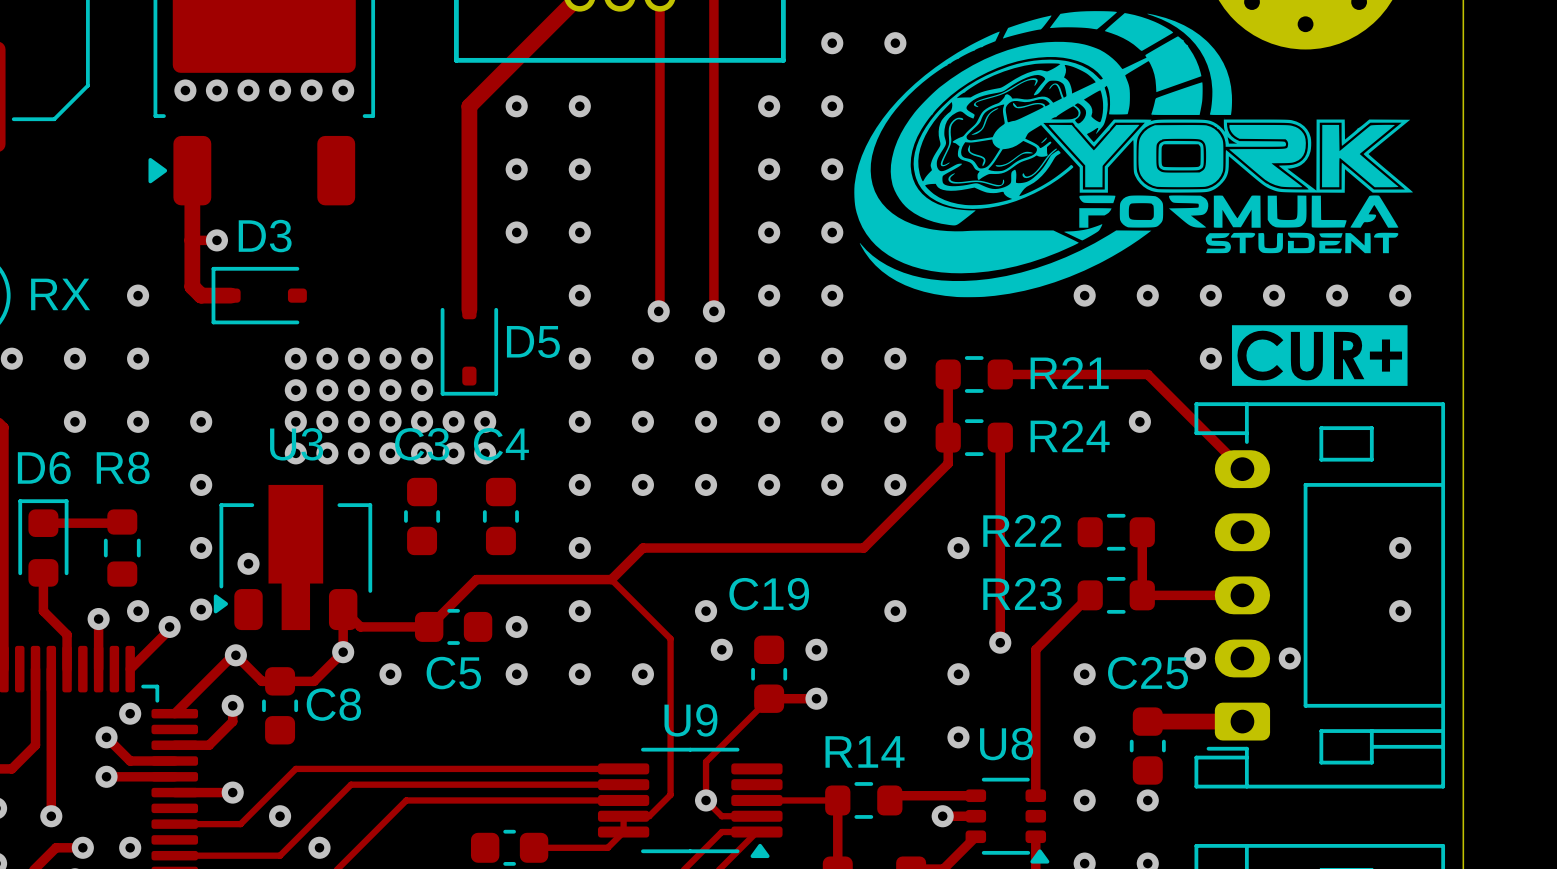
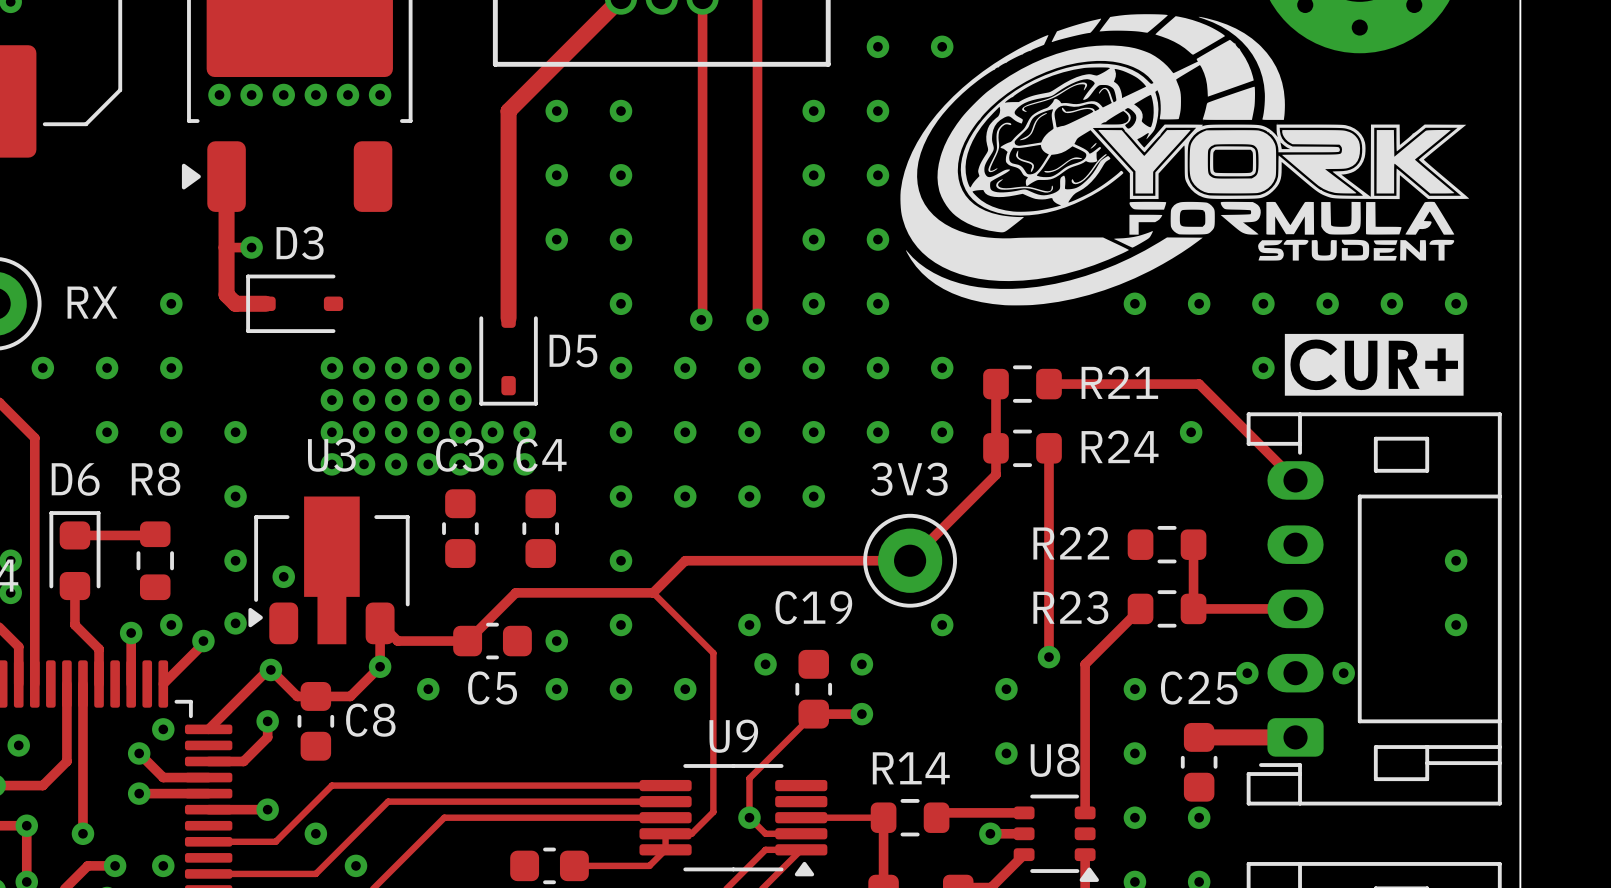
text: none -> 3V3 (909, 479)
via: (832, 484) -> none
via: (895, 484) -> none
part: none -> (910, 560)
via: (958, 548) -> none

